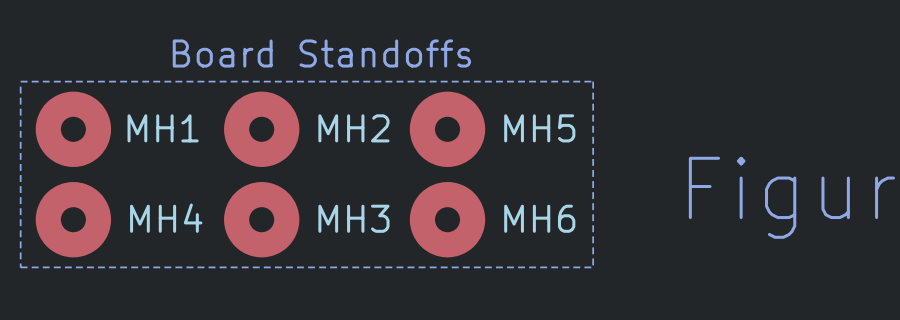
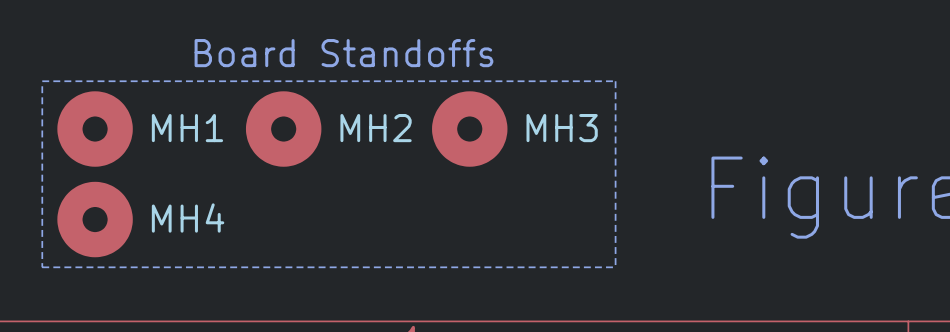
MH1 name position: MH1 (163, 128) -> MH1 (187, 128)
MH5 name: MH5 (539, 128) -> MH3 (562, 128)
MH3: (261, 219) -> none
MH6: (447, 219) -> none

